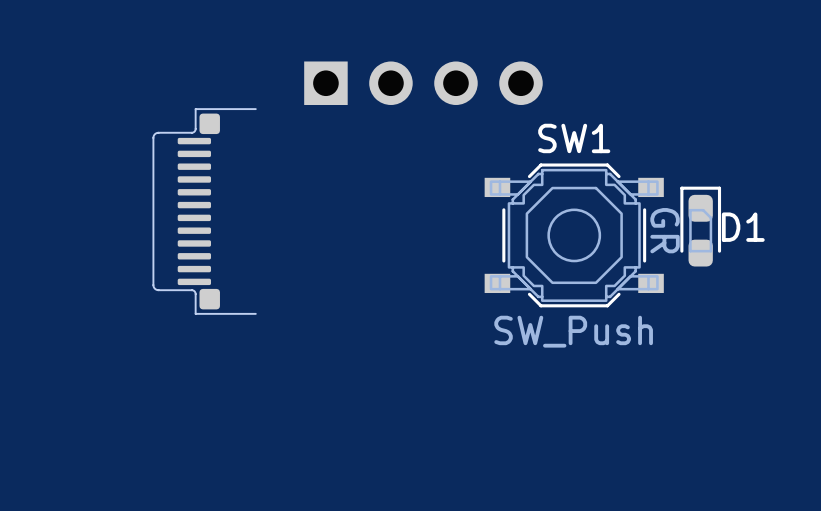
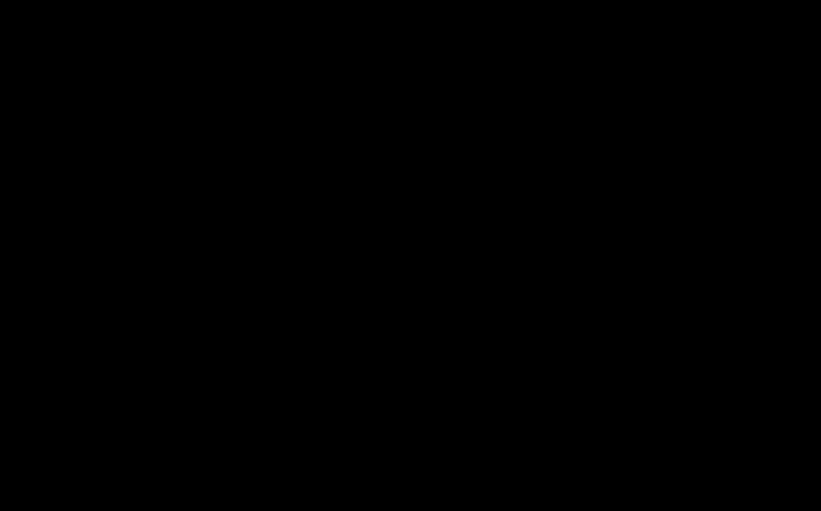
part: (423, 83) -> none
part: (204, 211) -> none
D1: GR (700, 226) -> none
SW1: SW_Push (574, 235) -> none

